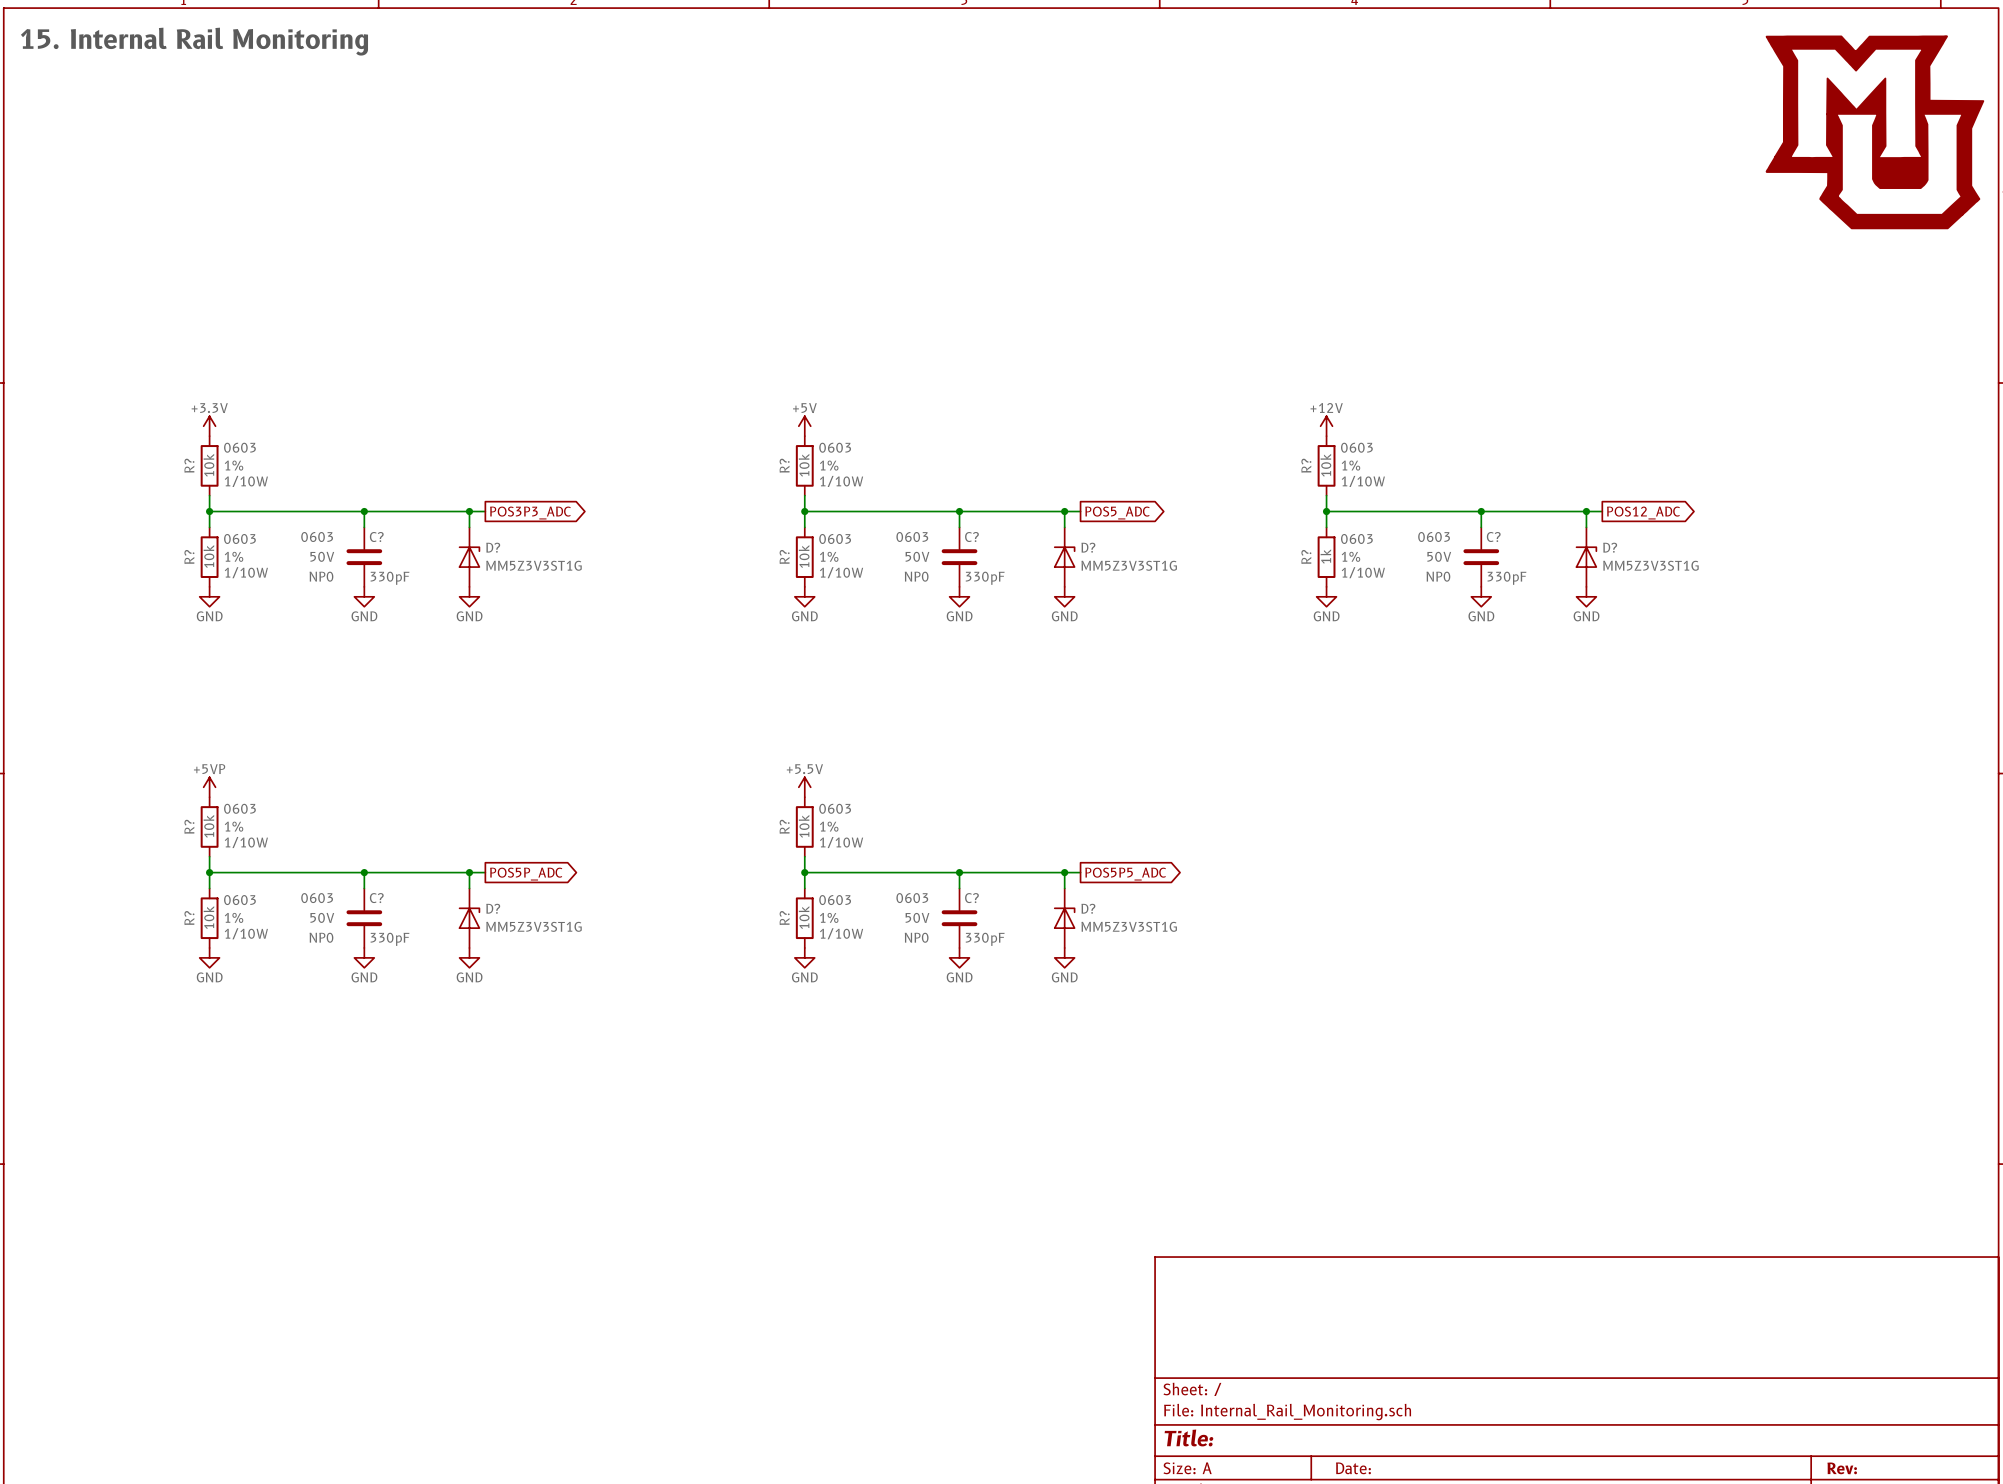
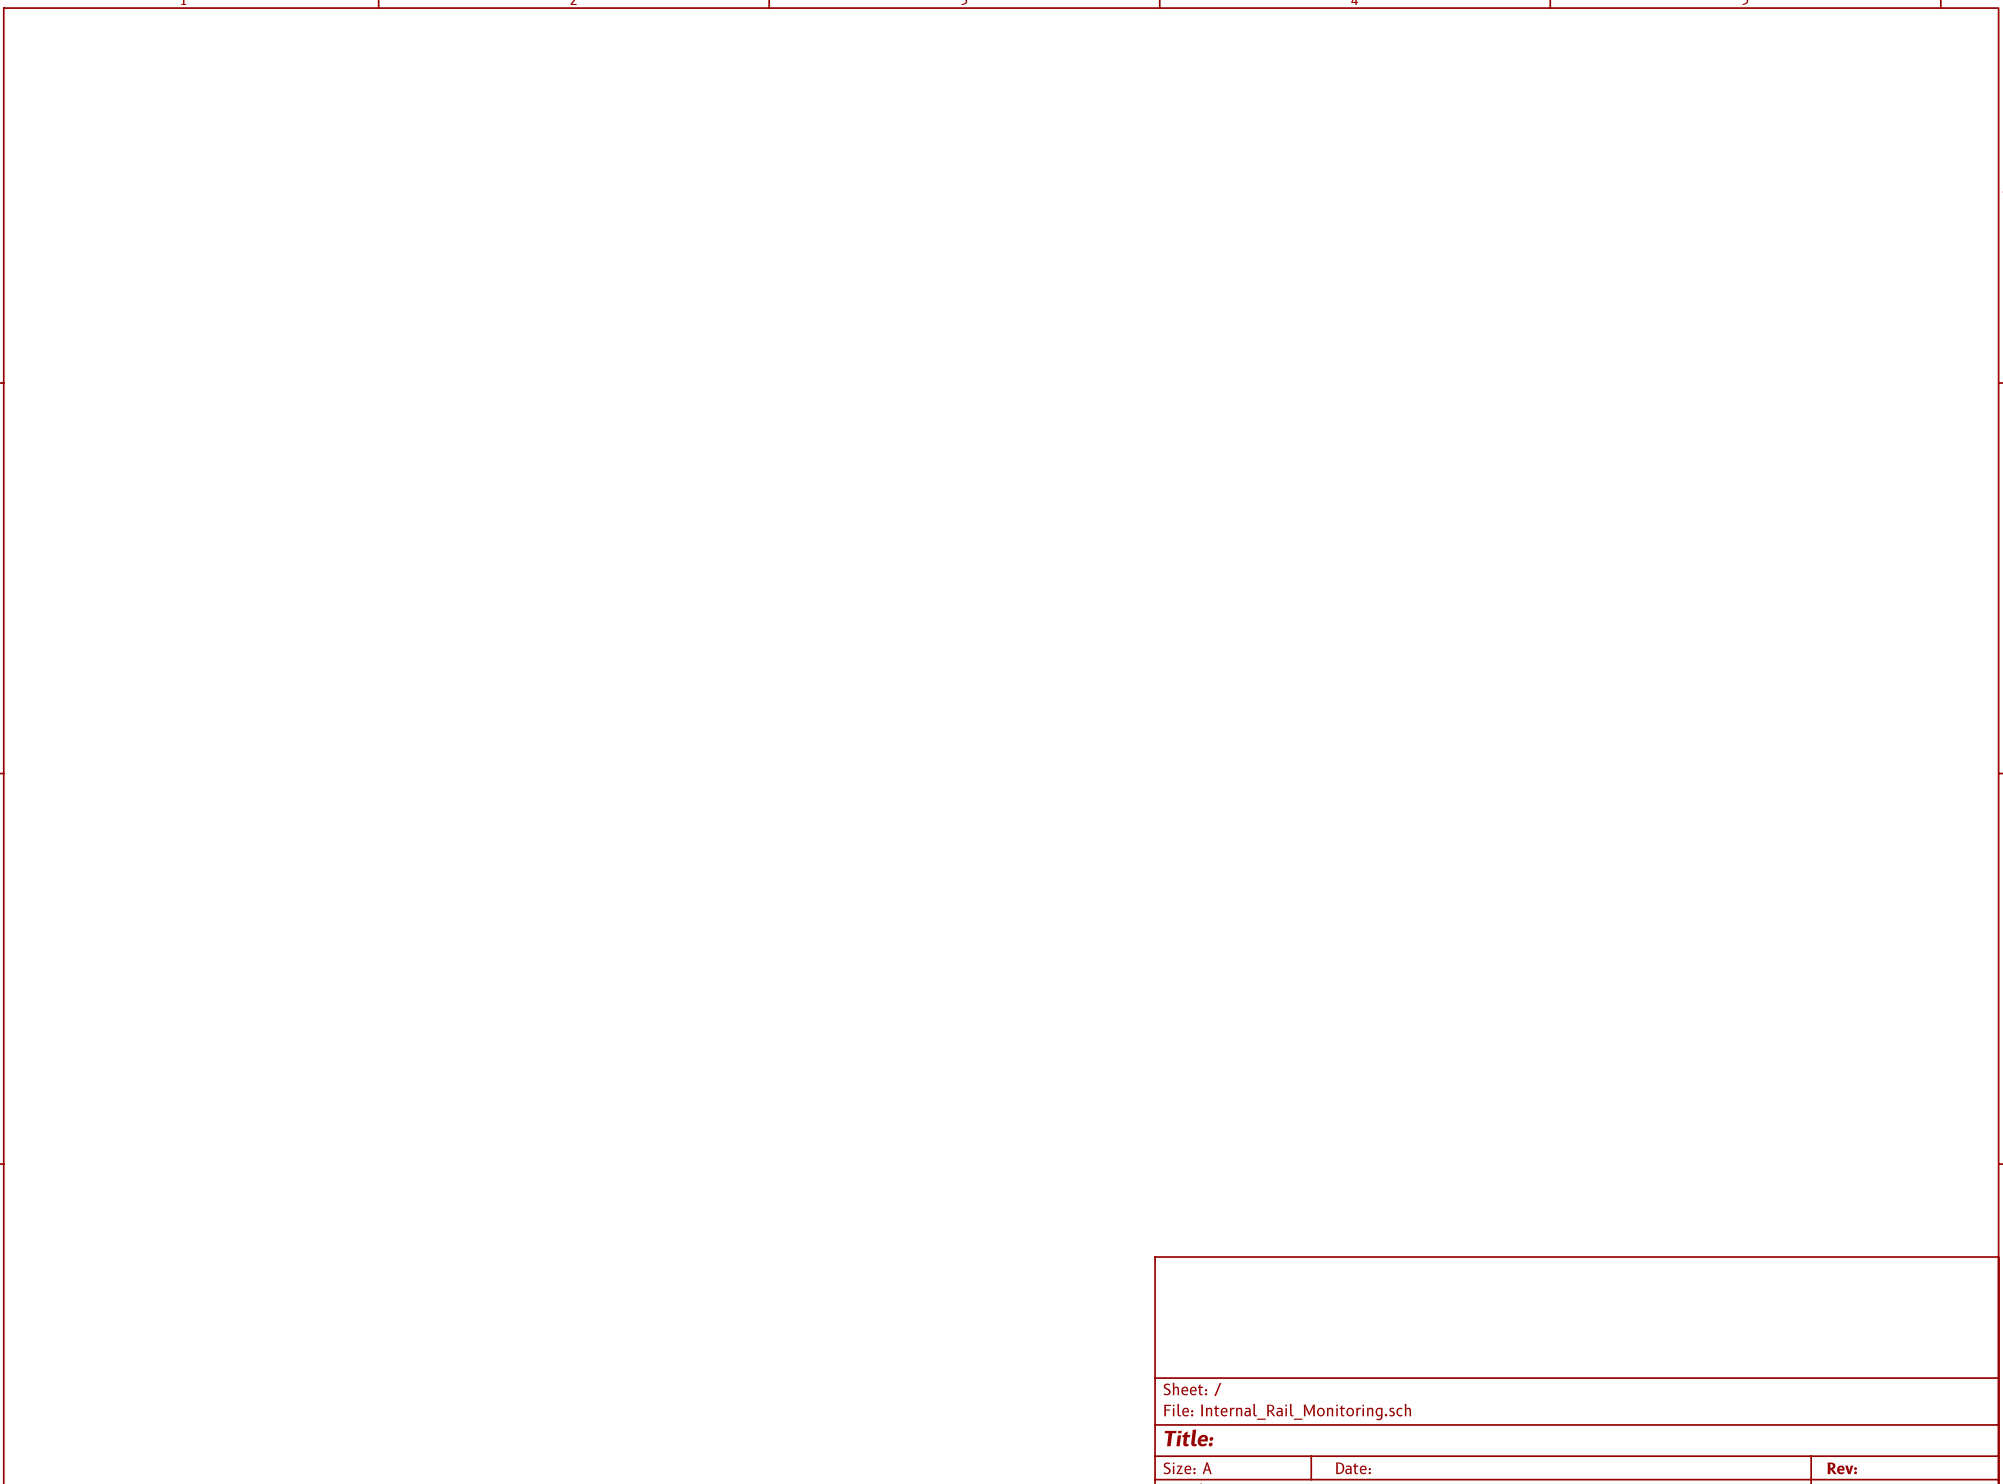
text: 15. Internal Rail Monitoring (194, 41) -> none
power symbol: (1875, 132) -> none
power symbol: +3.3V (209, 426) -> none
power symbol: +5V (804, 426) -> none
power symbol: +12V (1326, 426) -> none
R?: 10k (209, 465) -> none
R?: 10k (804, 465) -> none
R?: 10k (1326, 465) -> none
wire: (209, 495) (209, 527) -> none
wire: (804, 495) (804, 527) -> none
wire: (1326, 495) (1326, 527) -> none
wire: (209, 511) (485, 511) -> none
junction: (209, 511) -> none
wire: (364, 511) (364, 527) -> none
junction: (364, 511) -> none
wire: (469, 511) (469, 527) -> none
junction: (469, 511) -> none
wire: (804, 511) (1080, 511) -> none
junction: (804, 511) -> none
wire: (959, 511) (959, 527) -> none
junction: (959, 511) -> none
wire: (1064, 511) (1064, 527) -> none
junction: (1064, 511) -> none
wire: (1326, 511) (1602, 511) -> none
junction: (1326, 511) -> none
wire: (1481, 511) (1481, 527) -> none
junction: (1481, 511) -> none
wire: (1586, 511) (1586, 527) -> none
junction: (1586, 511) -> none
global label: POS3P3_ADC (530, 513) -> none
global label: POS5_ADC (1117, 513) -> none
global label: POS12_ADC (1643, 513) -> none
R?: 10k (209, 557) -> none
C?: 330pF (364, 557) -> none
D?: MM5Z3V3ST1G (469, 557) -> none
R?: 10k (804, 557) -> none
C?: 330pF (959, 557) -> none
D?: MM5Z3V3ST1G (1064, 557) -> none
R?: 1k (1326, 557) -> none
C?: 330pF (1481, 557) -> none
D?: MM5Z3V3ST1G (1586, 557) -> none
power symbol: GND (209, 596) -> none
power symbol: GND (364, 596) -> none
power symbol: GND (469, 596) -> none
power symbol: GND (804, 596) -> none
power symbol: GND (959, 596) -> none
power symbol: GND (1064, 596) -> none
power symbol: GND (1326, 596) -> none
power symbol: GND (1481, 596) -> none
power symbol: GND (1586, 596) -> none
power symbol: +5VP (209, 787) -> none
power symbol: +5.5V (804, 787) -> none
R?: 10k (209, 826) -> none
R?: 10k (804, 826) -> none
wire: (209, 856) (209, 888) -> none
wire: (804, 856) (804, 888) -> none
wire: (209, 872) (485, 872) -> none
junction: (209, 872) -> none
wire: (364, 872) (364, 888) -> none
junction: (364, 872) -> none
wire: (469, 872) (469, 888) -> none
junction: (469, 872) -> none
wire: (804, 872) (1080, 872) -> none
junction: (804, 872) -> none
wire: (959, 872) (959, 888) -> none
junction: (959, 872) -> none
wire: (1064, 872) (1064, 888) -> none
junction: (1064, 872) -> none
global label: POS5P_ADC (526, 874) -> none
global label: POS5P5_ADC (1125, 874) -> none
R?: 10k (209, 918) -> none
C?: 330pF (364, 918) -> none
D?: MM5Z3V3ST1G (469, 918) -> none
R?: 10k (804, 918) -> none
C?: 330pF (959, 918) -> none
D?: MM5Z3V3ST1G (1064, 918) -> none
power symbol: GND (209, 957) -> none
power symbol: GND (364, 957) -> none
power symbol: GND (469, 957) -> none
power symbol: GND (804, 957) -> none
power symbol: GND (959, 957) -> none
power symbol: GND (1064, 957) -> none

